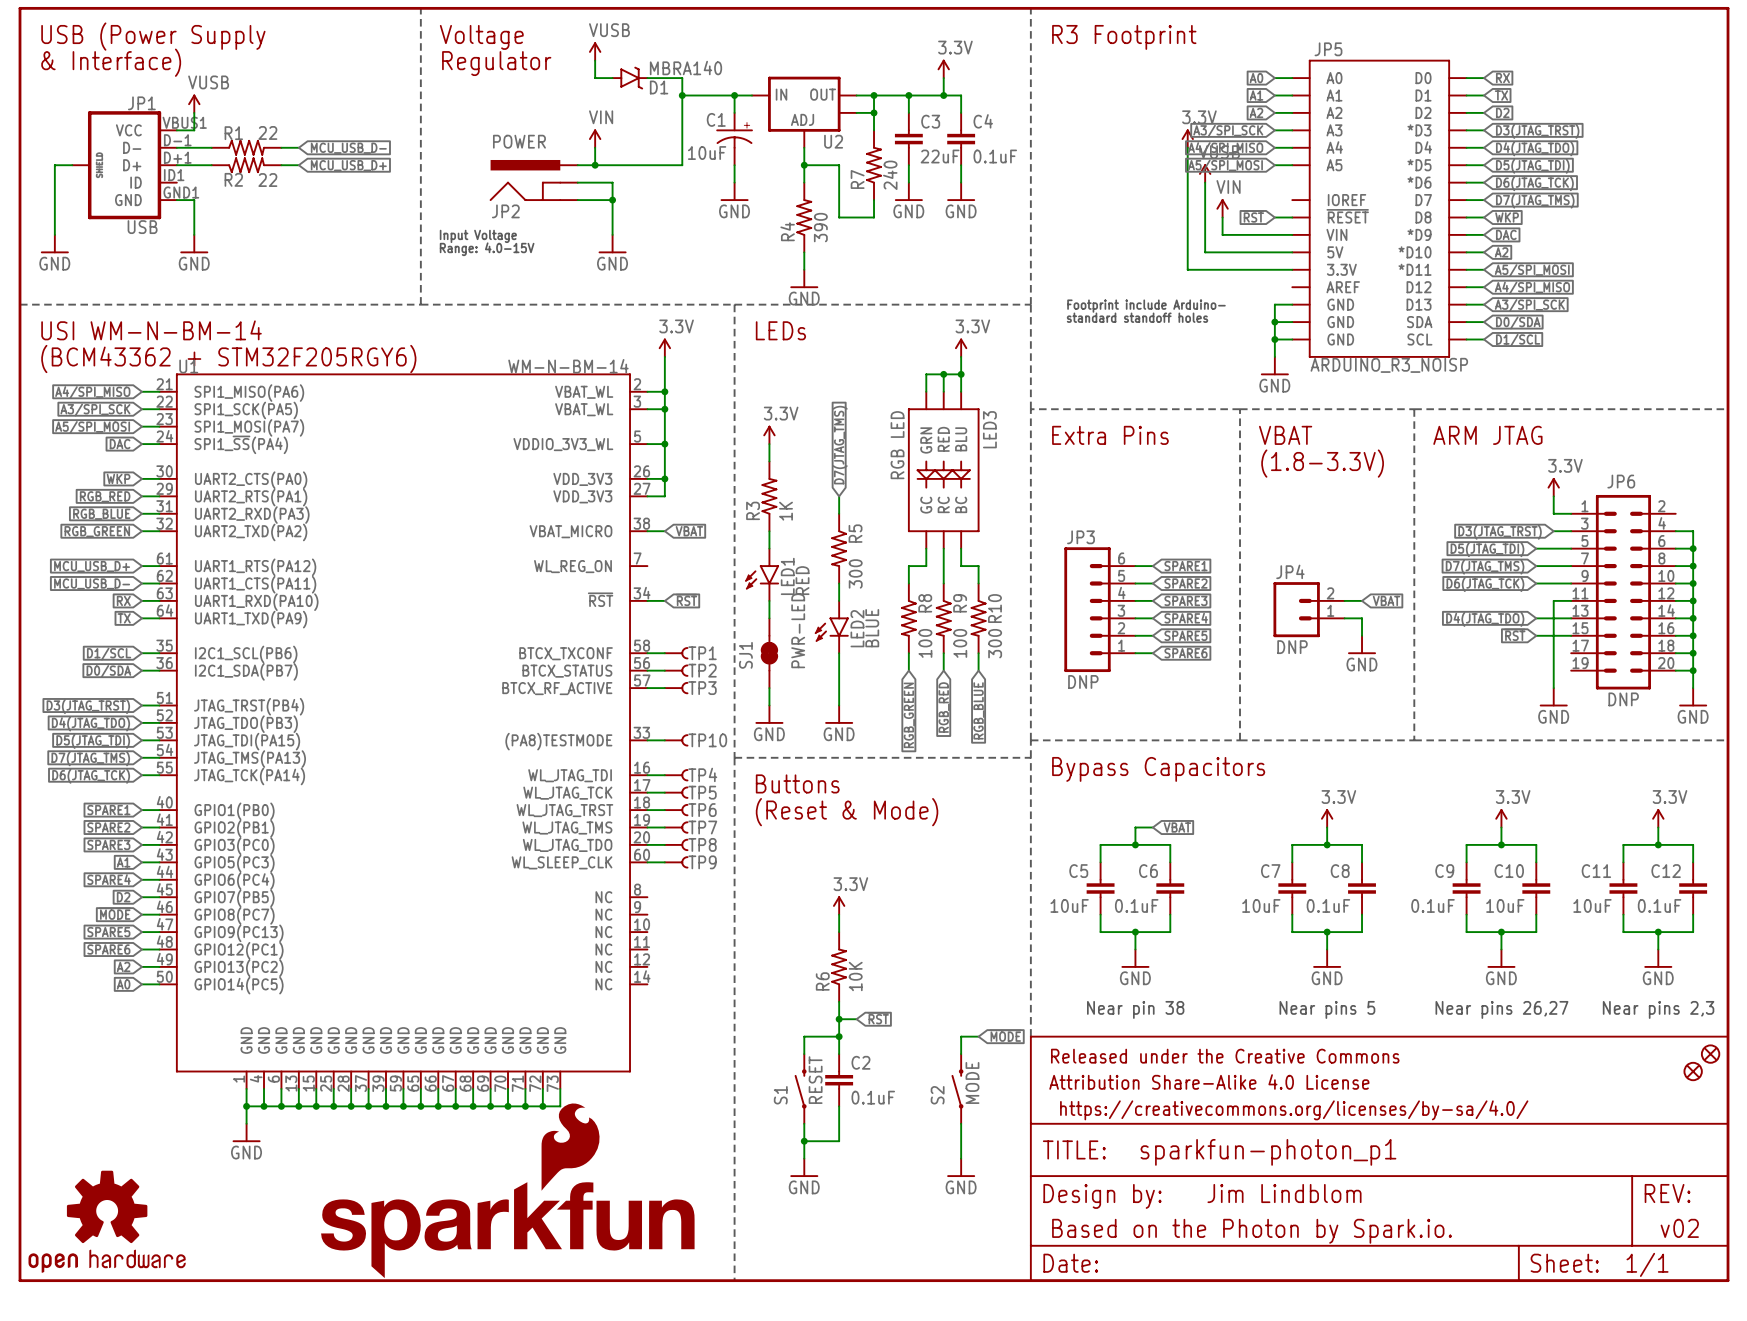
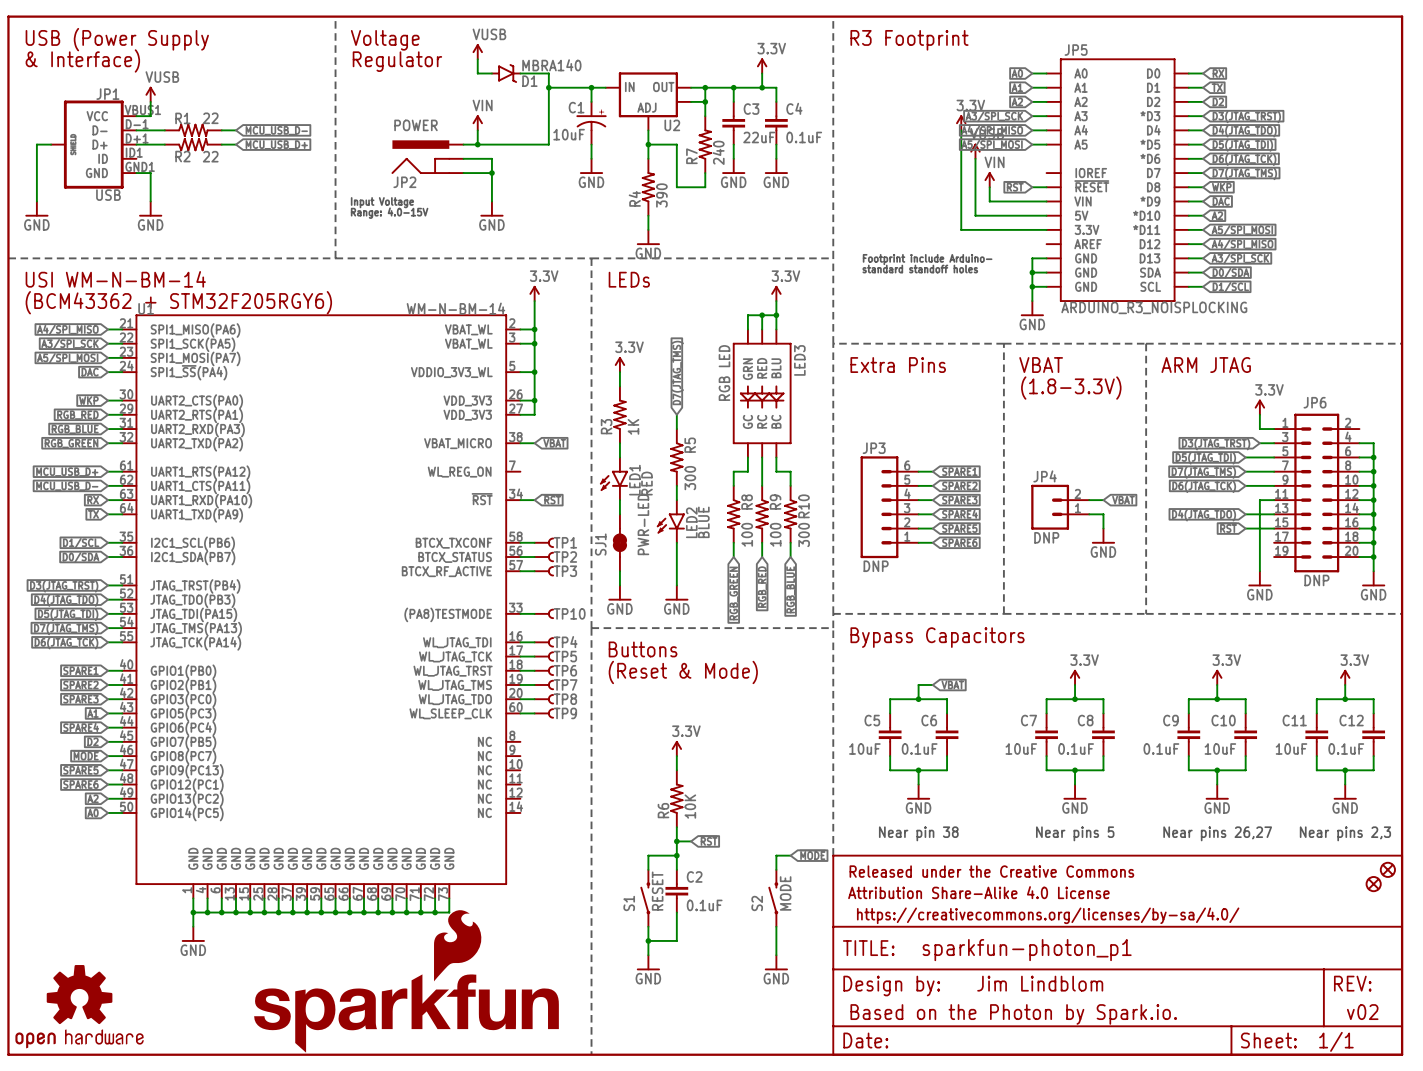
JP5 value: ARDUINO_R3_NOISP (1389, 365) -> ARDUINO_R3_NOISPLOCKING (1154, 307)

